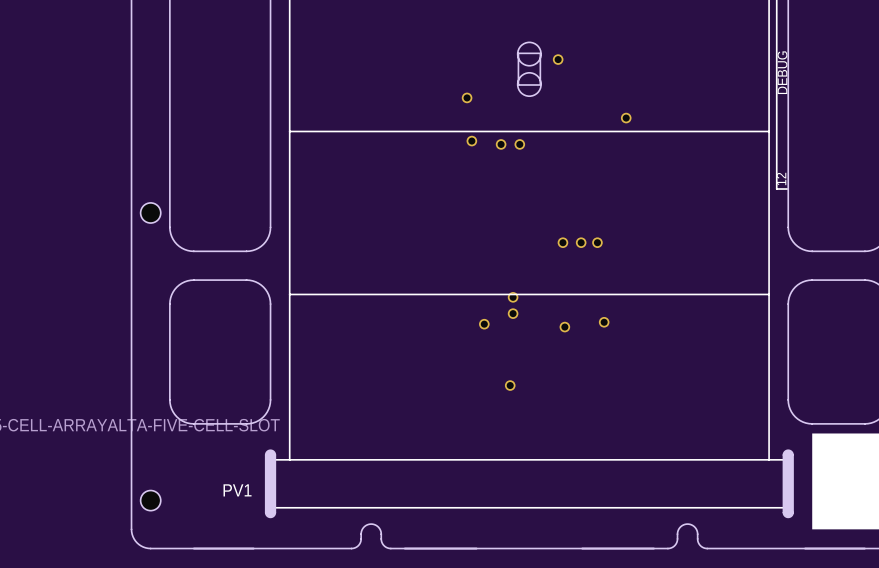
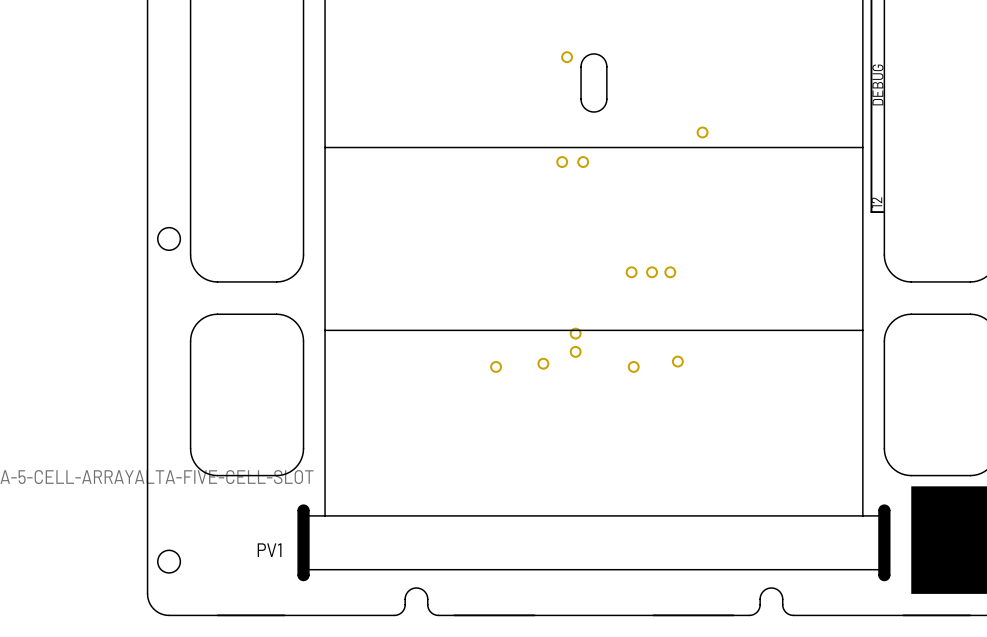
part footprint: [517, 42, 542, 97] -> [581, 53, 607, 113]
part: none -> (567, 57)
part: (558, 59) -> none
part: (467, 97) -> none
part: (471, 141) -> none
part position: (510, 385) -> (496, 366)

